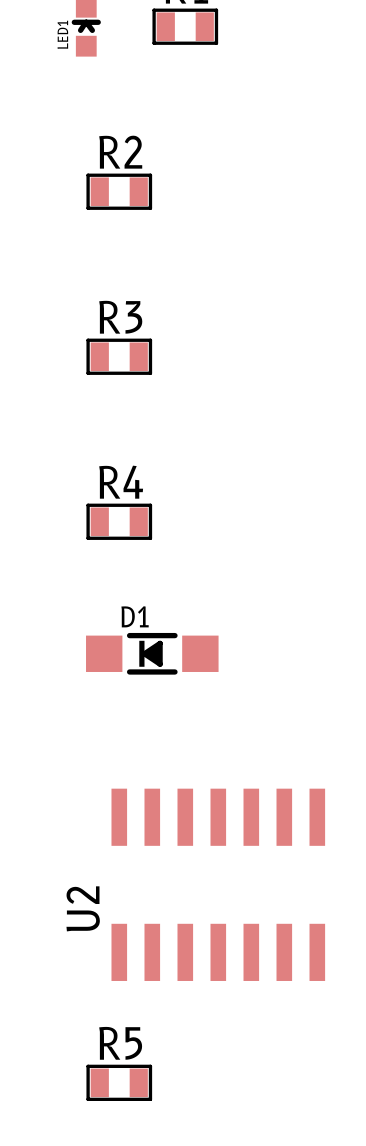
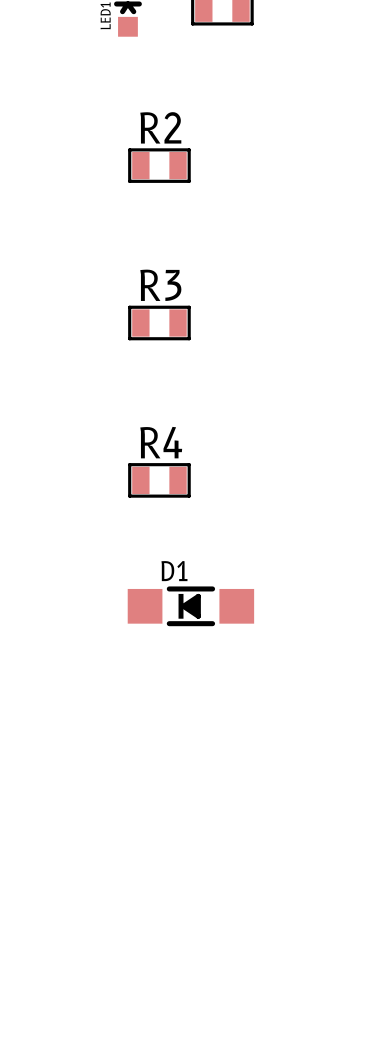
U2: (218, 884) -> none
R5: (119, 1082) -> none

